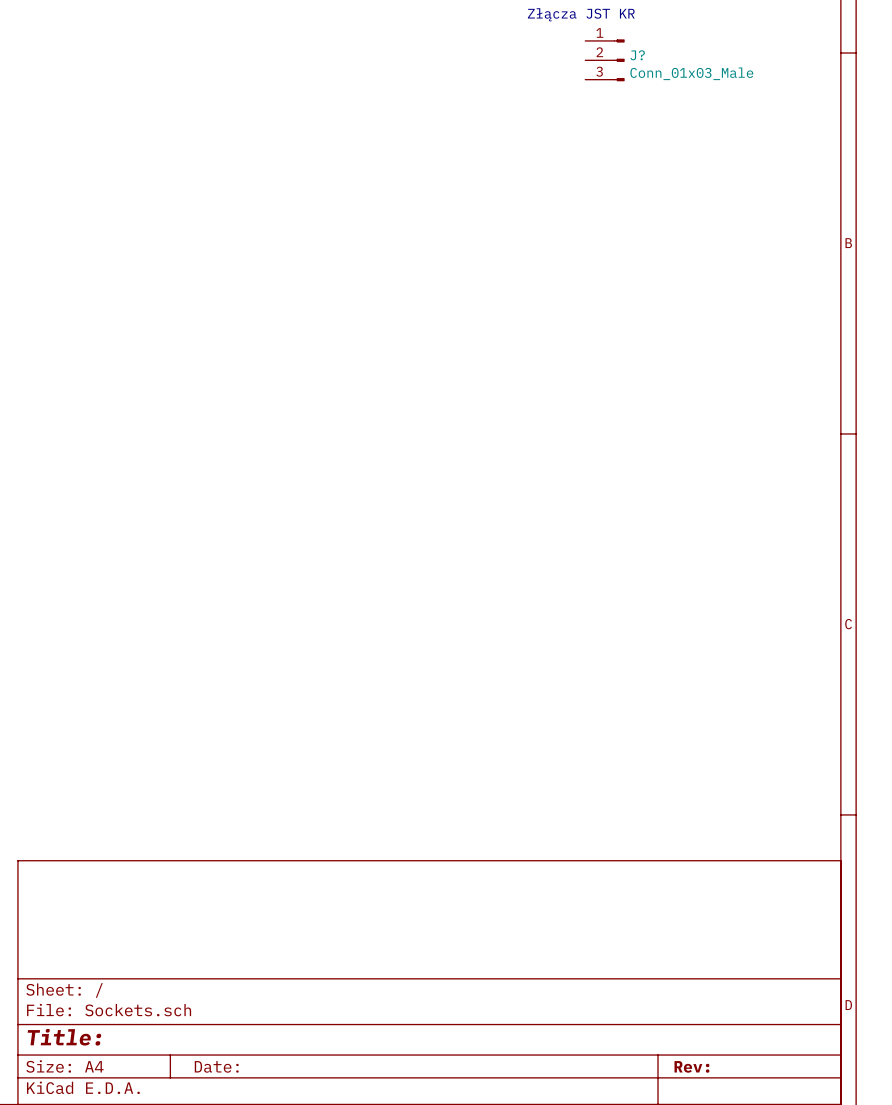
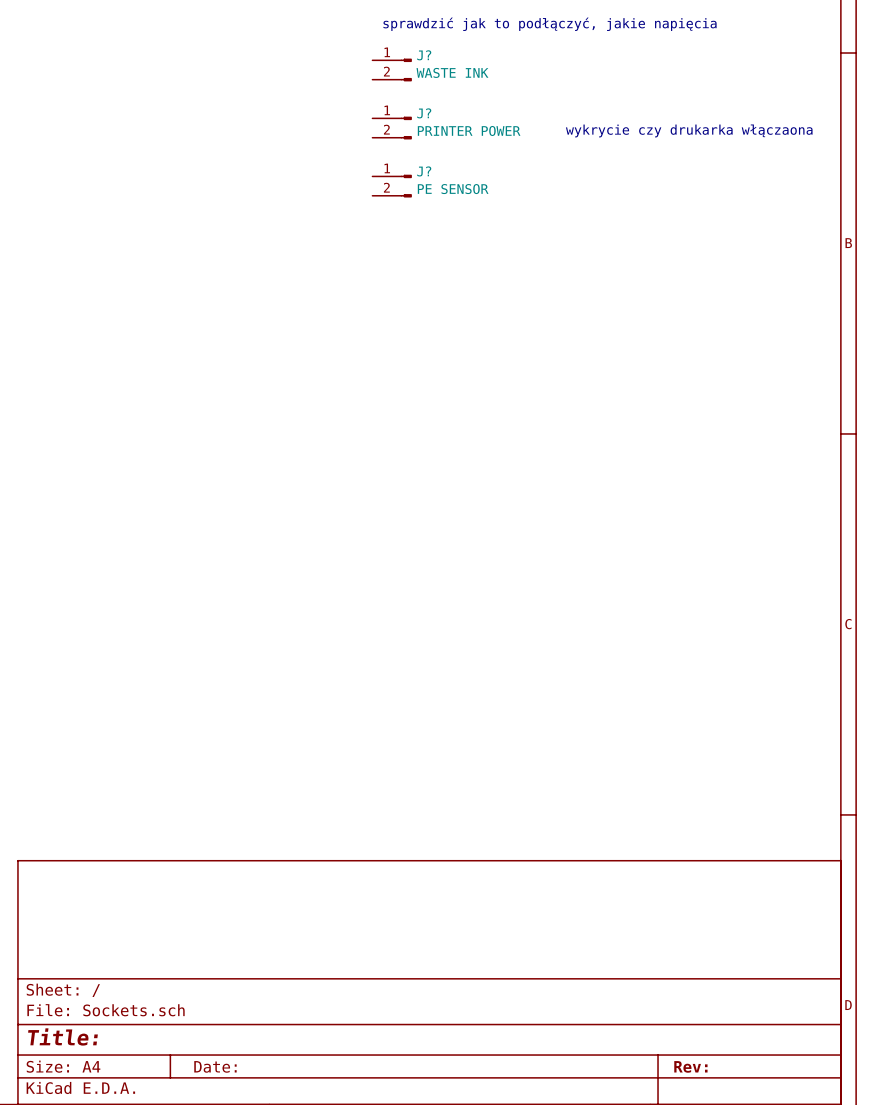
text: Złącza JST KR (581, 14) -> none
text: none -> sprawdzić jak to podłączyć, jakie napięcia (550, 24)
J?: Conn_01x03_Male (604, 60) -> none
J?: none -> WASTE INK (392, 69)
J?: none -> PRINTER POWER (392, 128)
text: none -> wykrycie czy drukarka włączaona (689, 130)
J?: none -> PE SENSOR (392, 186)

